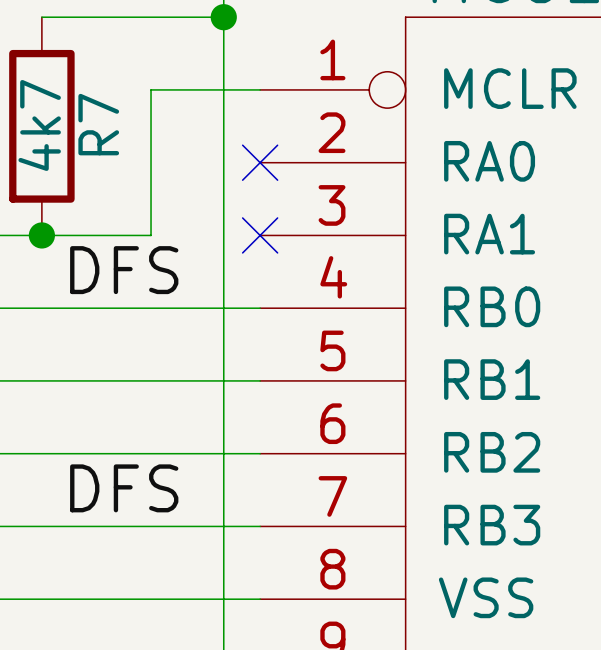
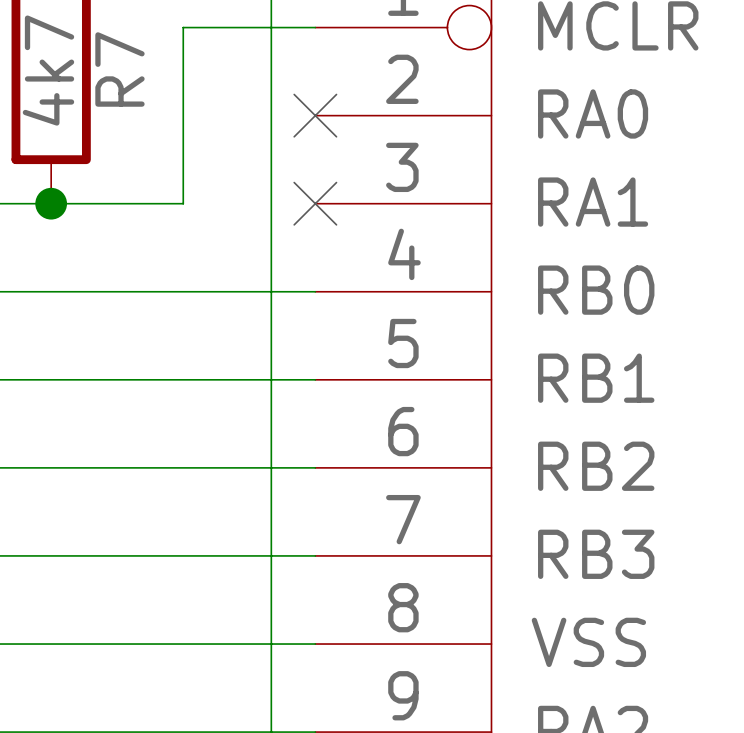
label: DFS (124, 270) -> none
label: DFS (124, 488) -> none

